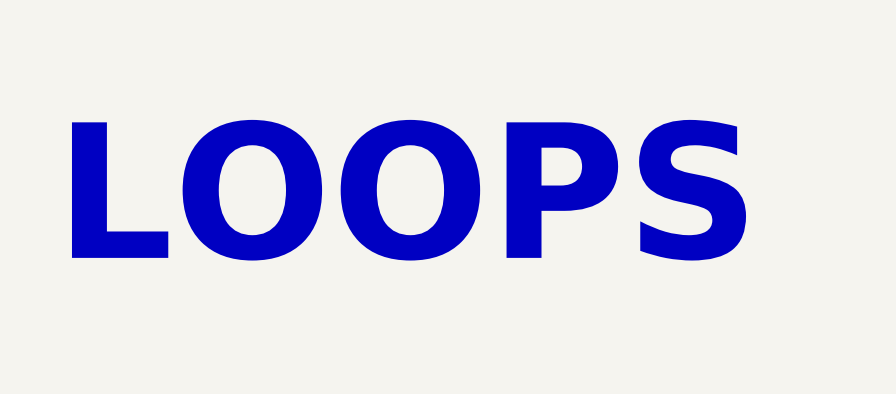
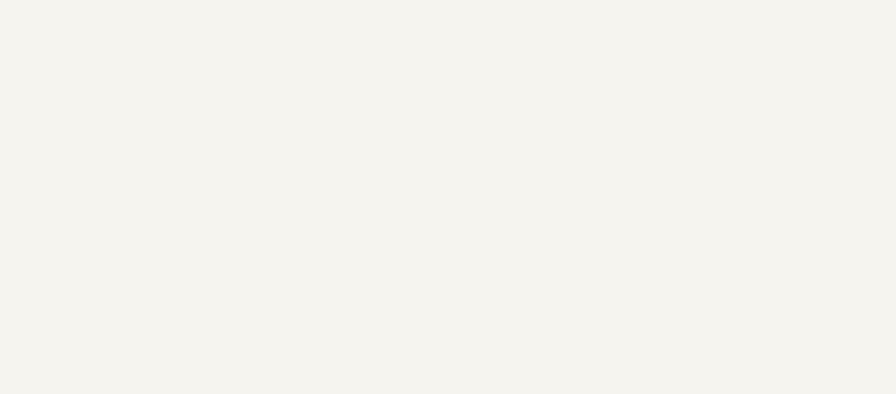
text: LOOPS (409, 190) -> none

